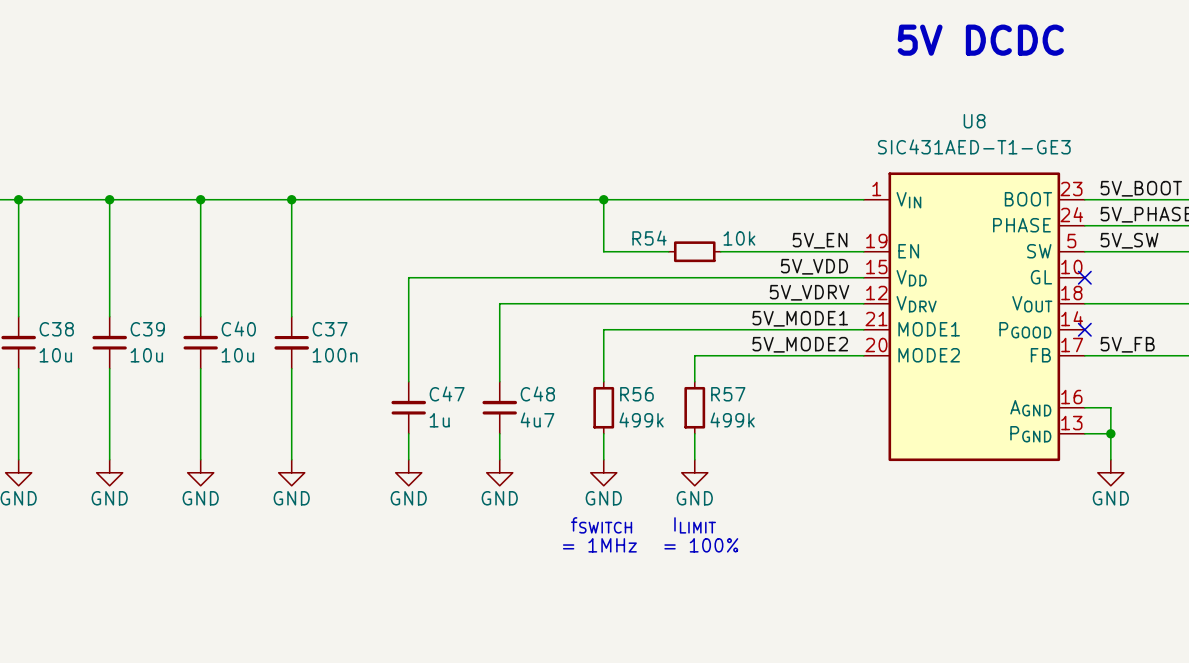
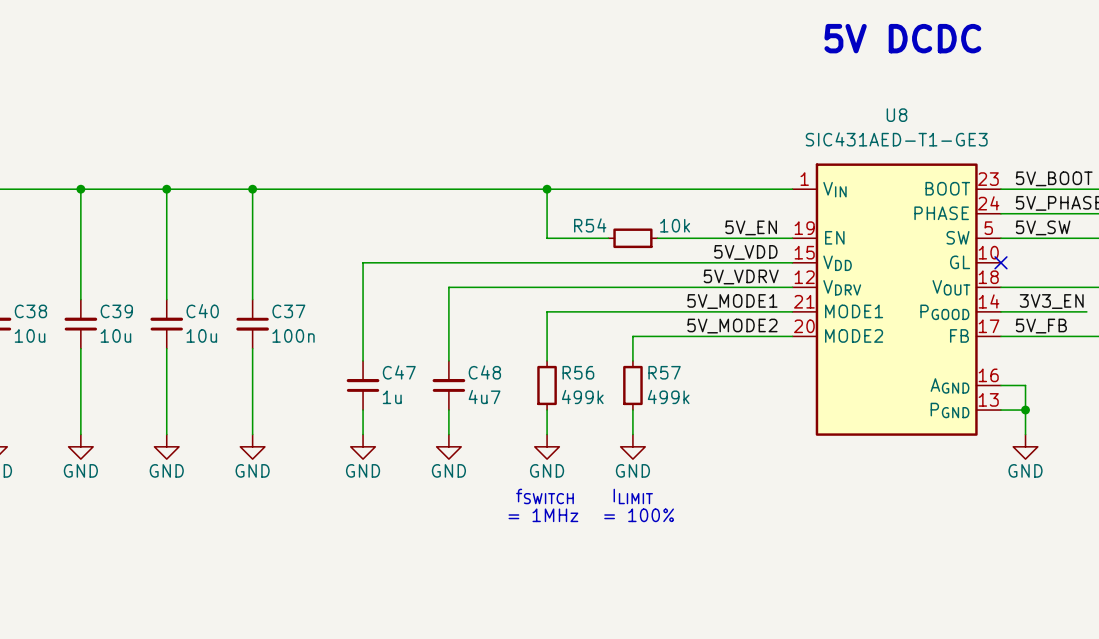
label: none -> 3V3_EN (1051, 301)
wire: none -> (1000, 311) (1086, 311)
no-connect mark: (1084, 329) -> none

